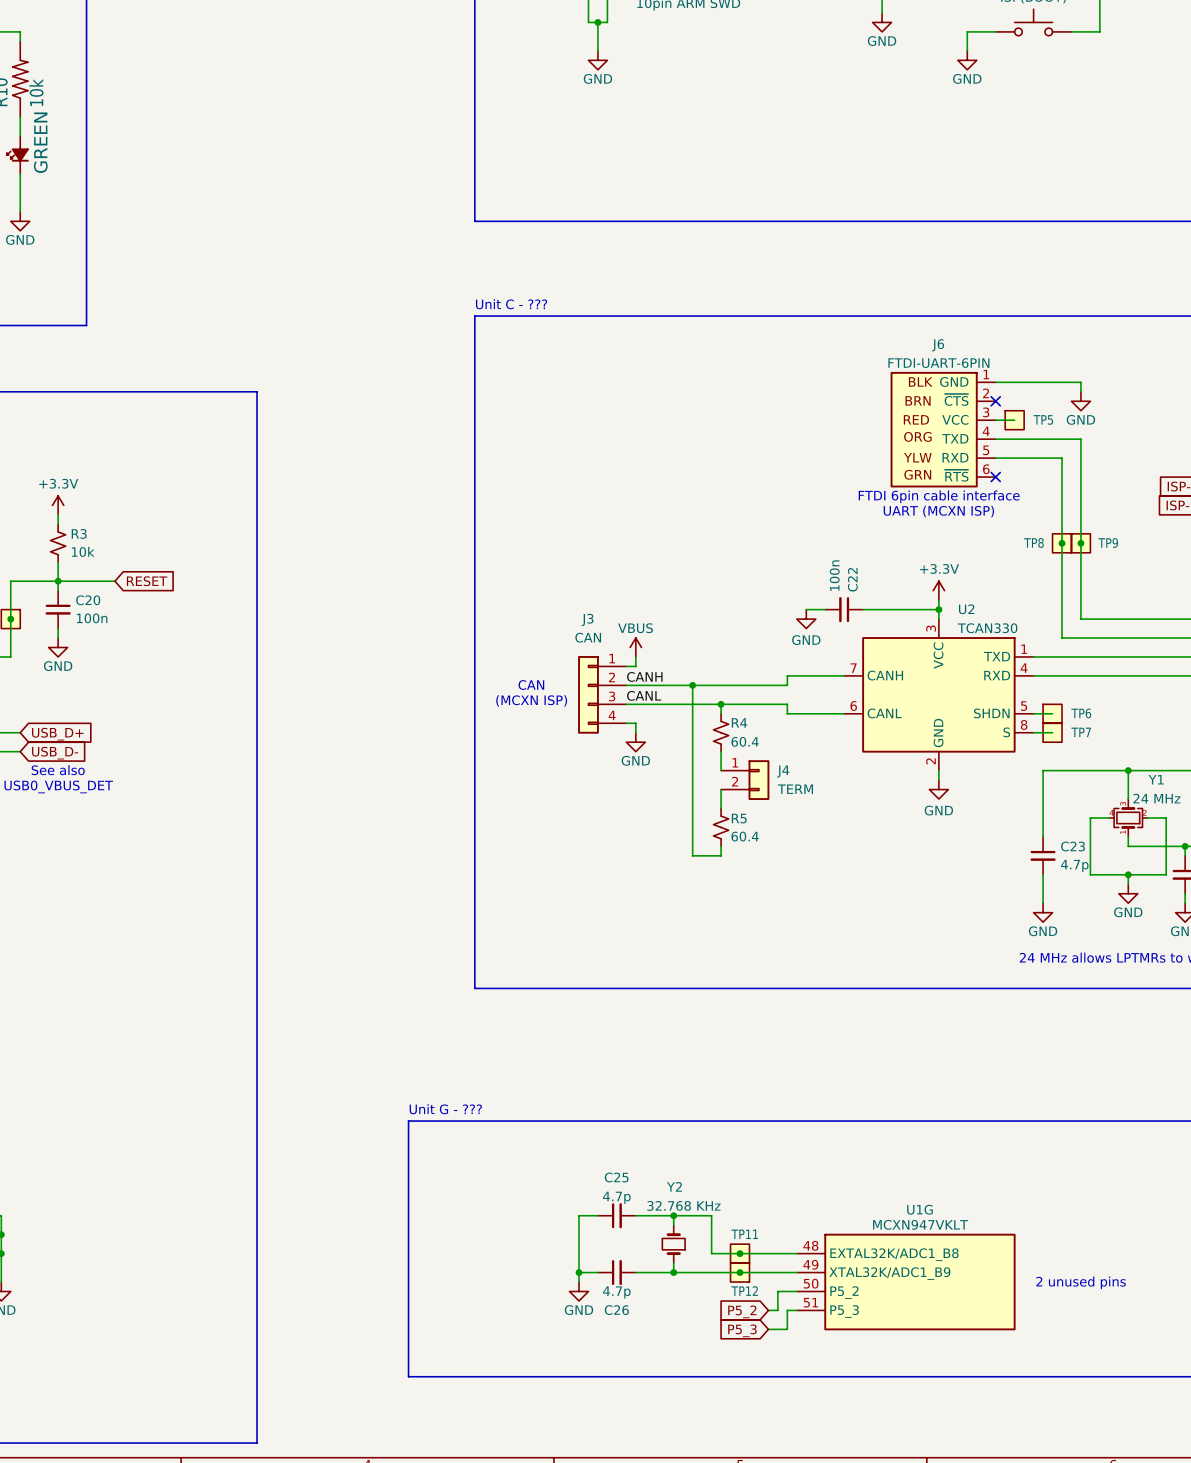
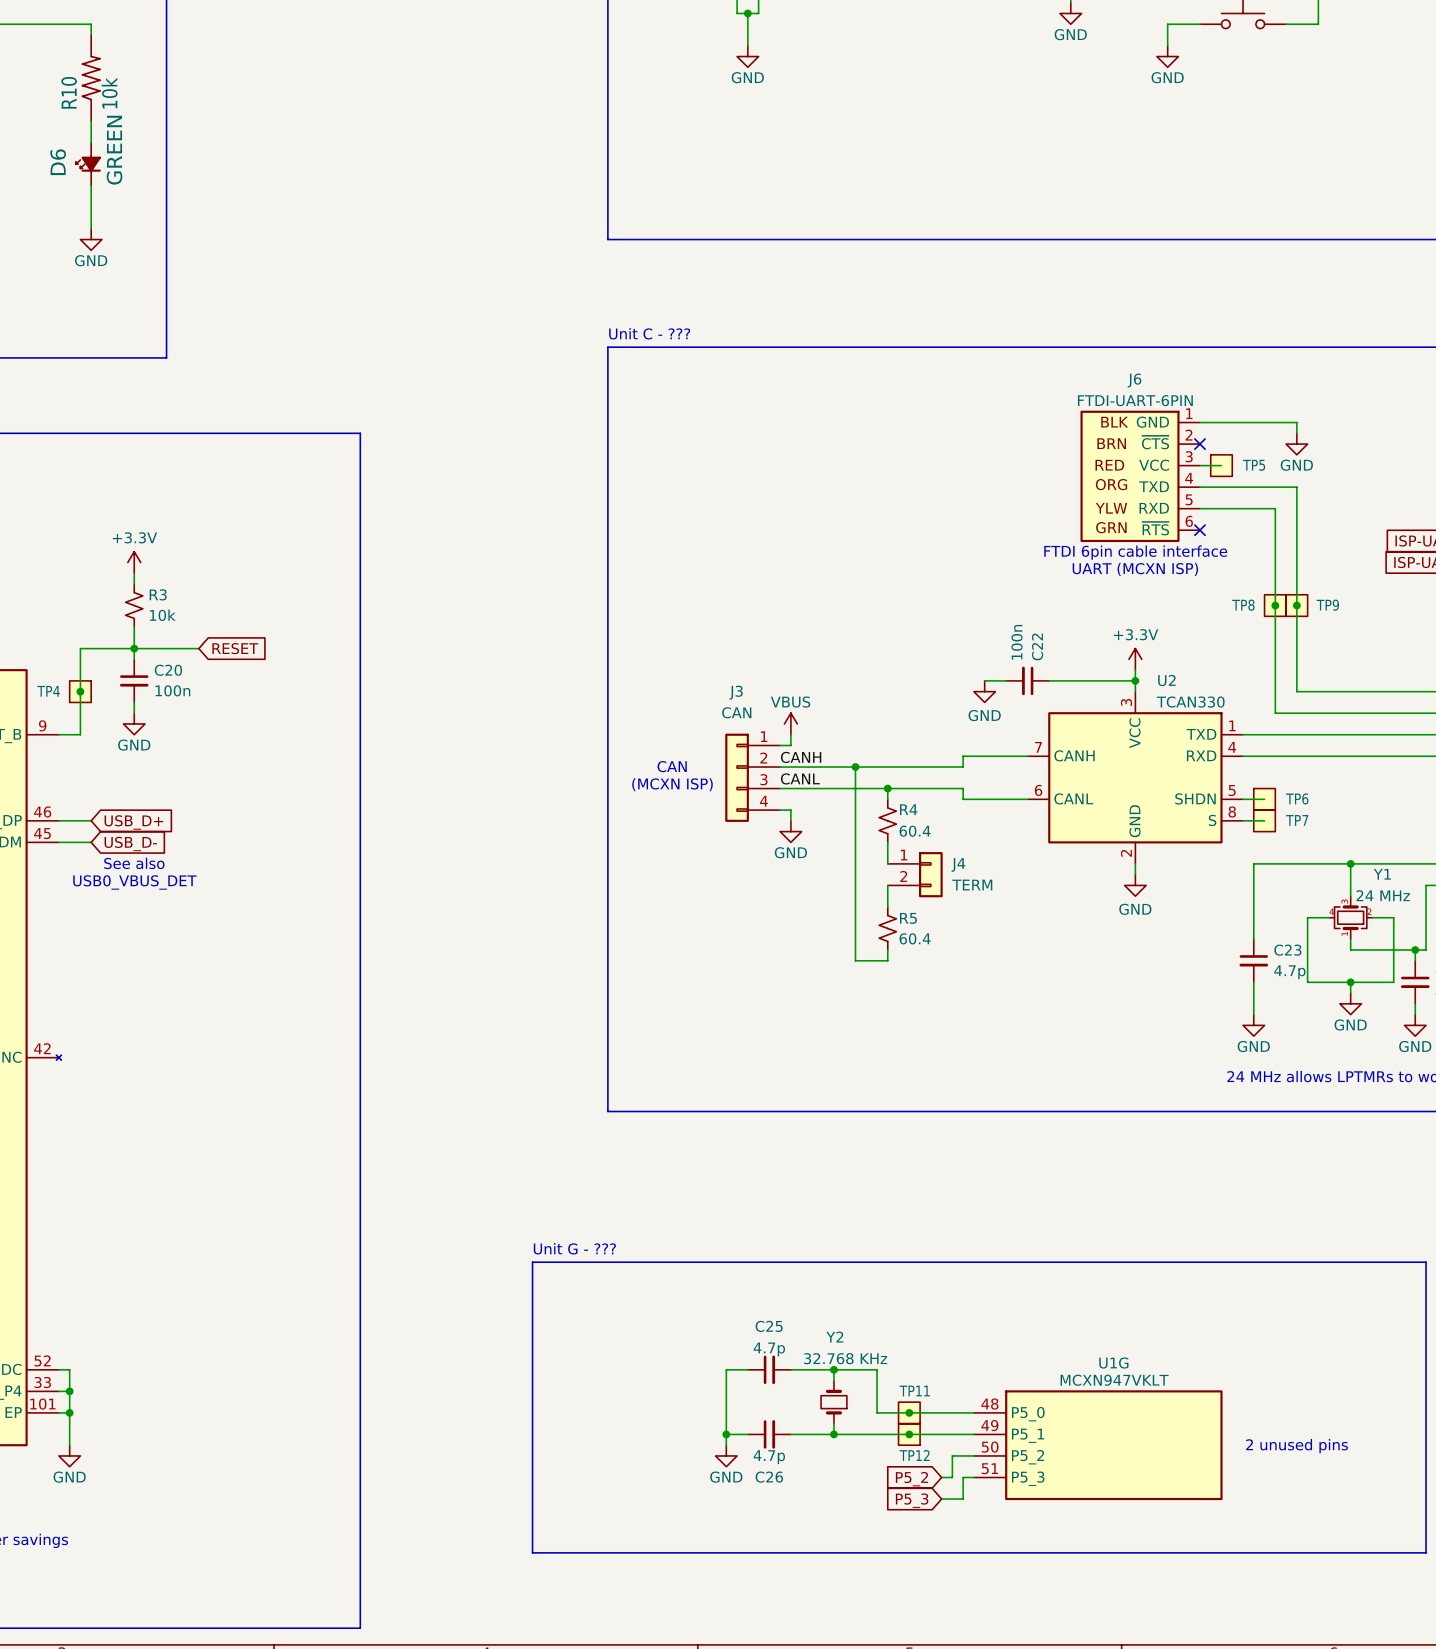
U1G pin name: EXTAL32K/ADC1_B8 (894, 1254) -> P5_0 (1028, 1414)
U1G pin name: XTAL32K/ADC1_B9 (889, 1273) -> P5_1 (1028, 1435)

